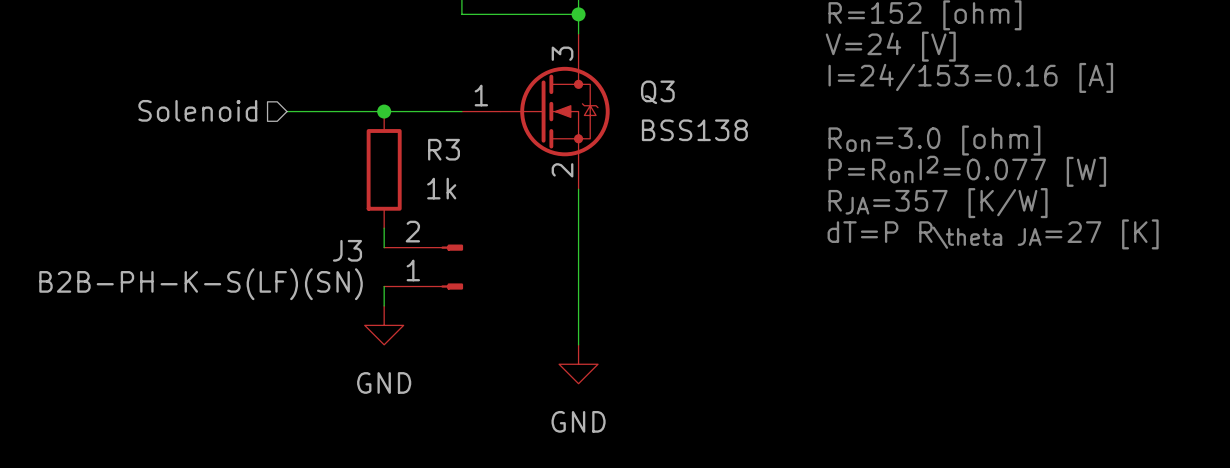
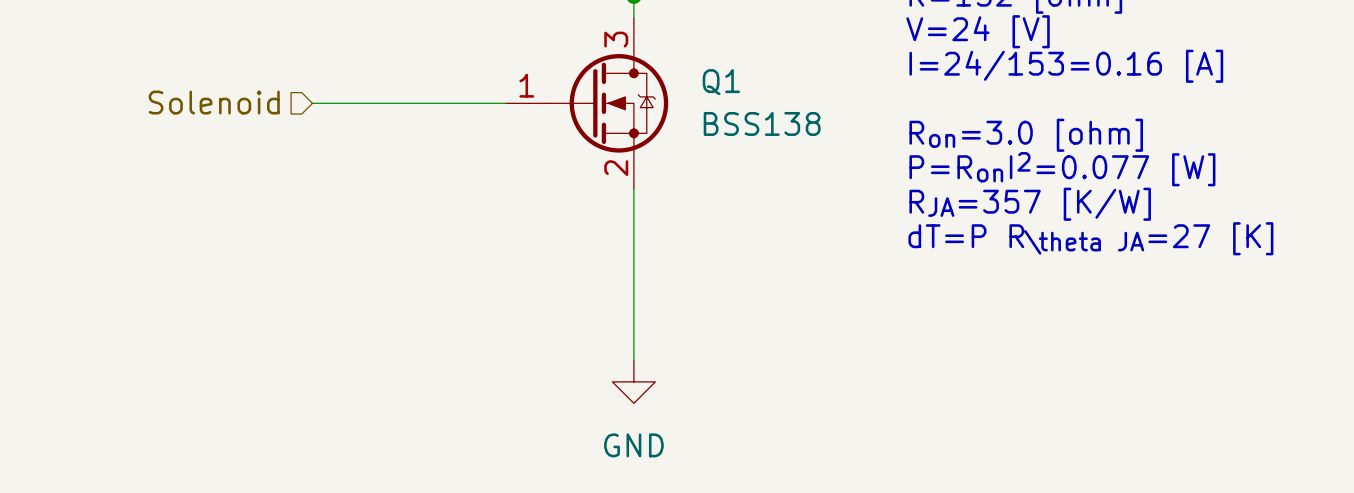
Q3 name: Q3 (657, 92) -> Q1 (721, 82)
junction: (384, 111) -> none
R3: 1k (384, 169) -> none
wire: (384, 228) (384, 247) -> none
J3: B2B-PH-K-S(LF)(SN) (423, 267) -> none
wire: (384, 286) (384, 305) -> none
power symbol: GND (384, 325) -> none

